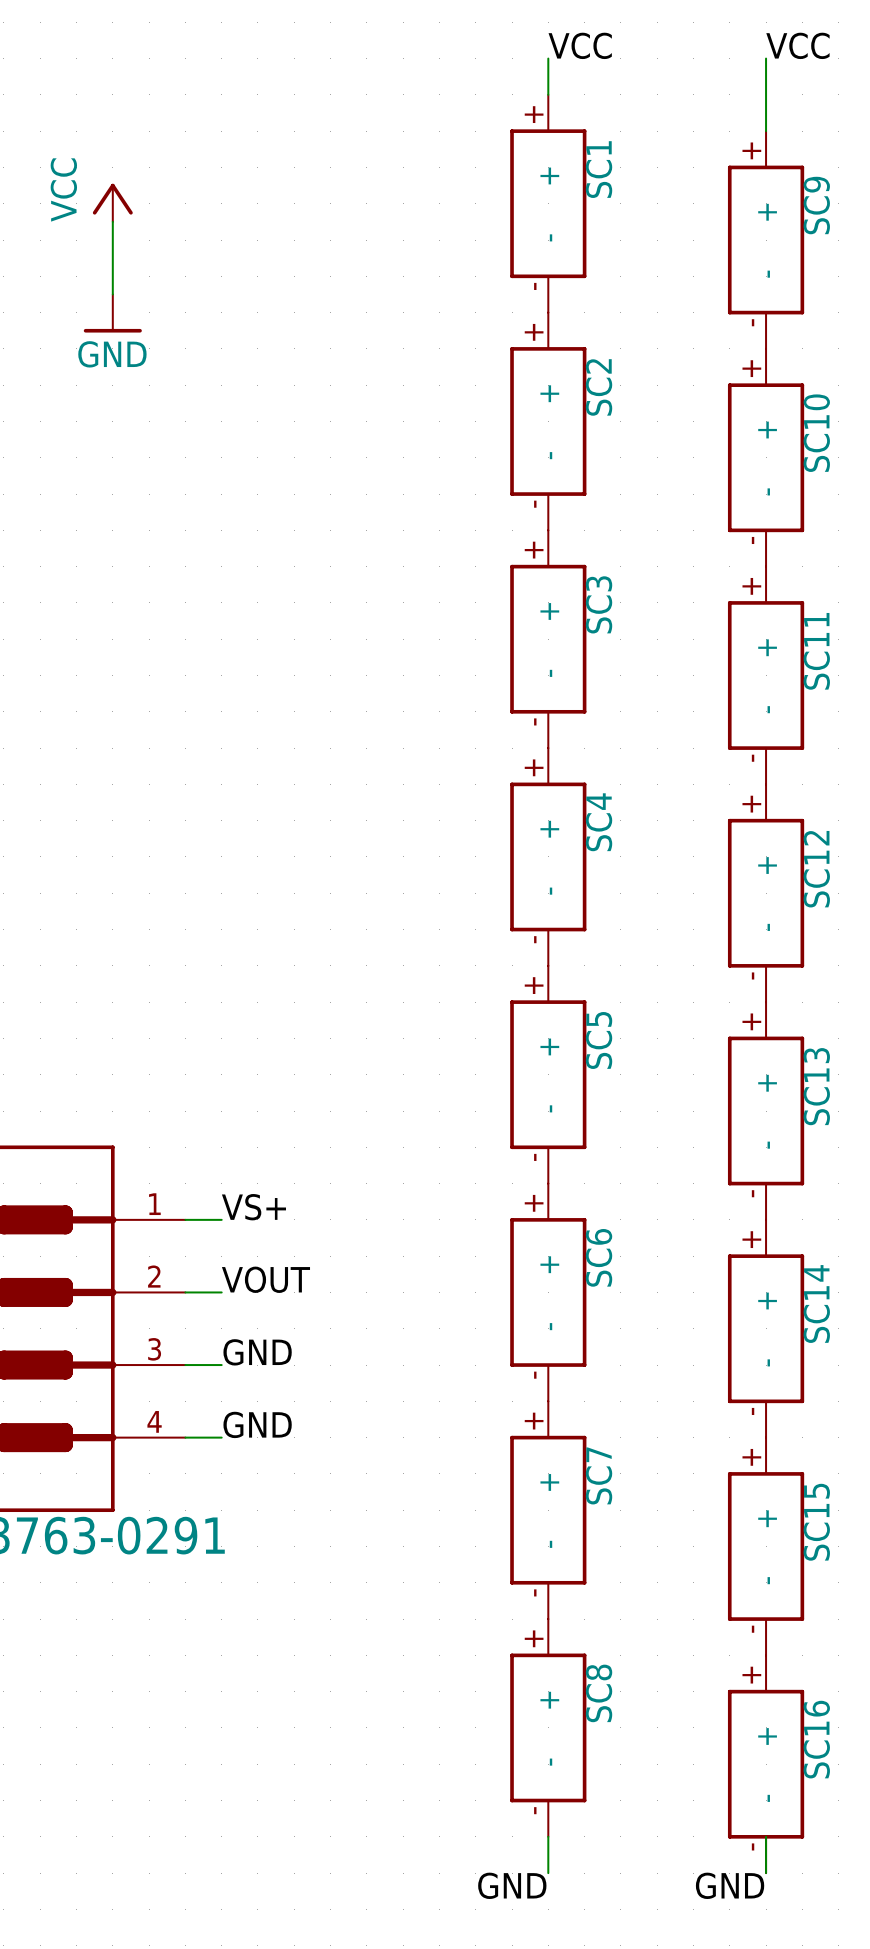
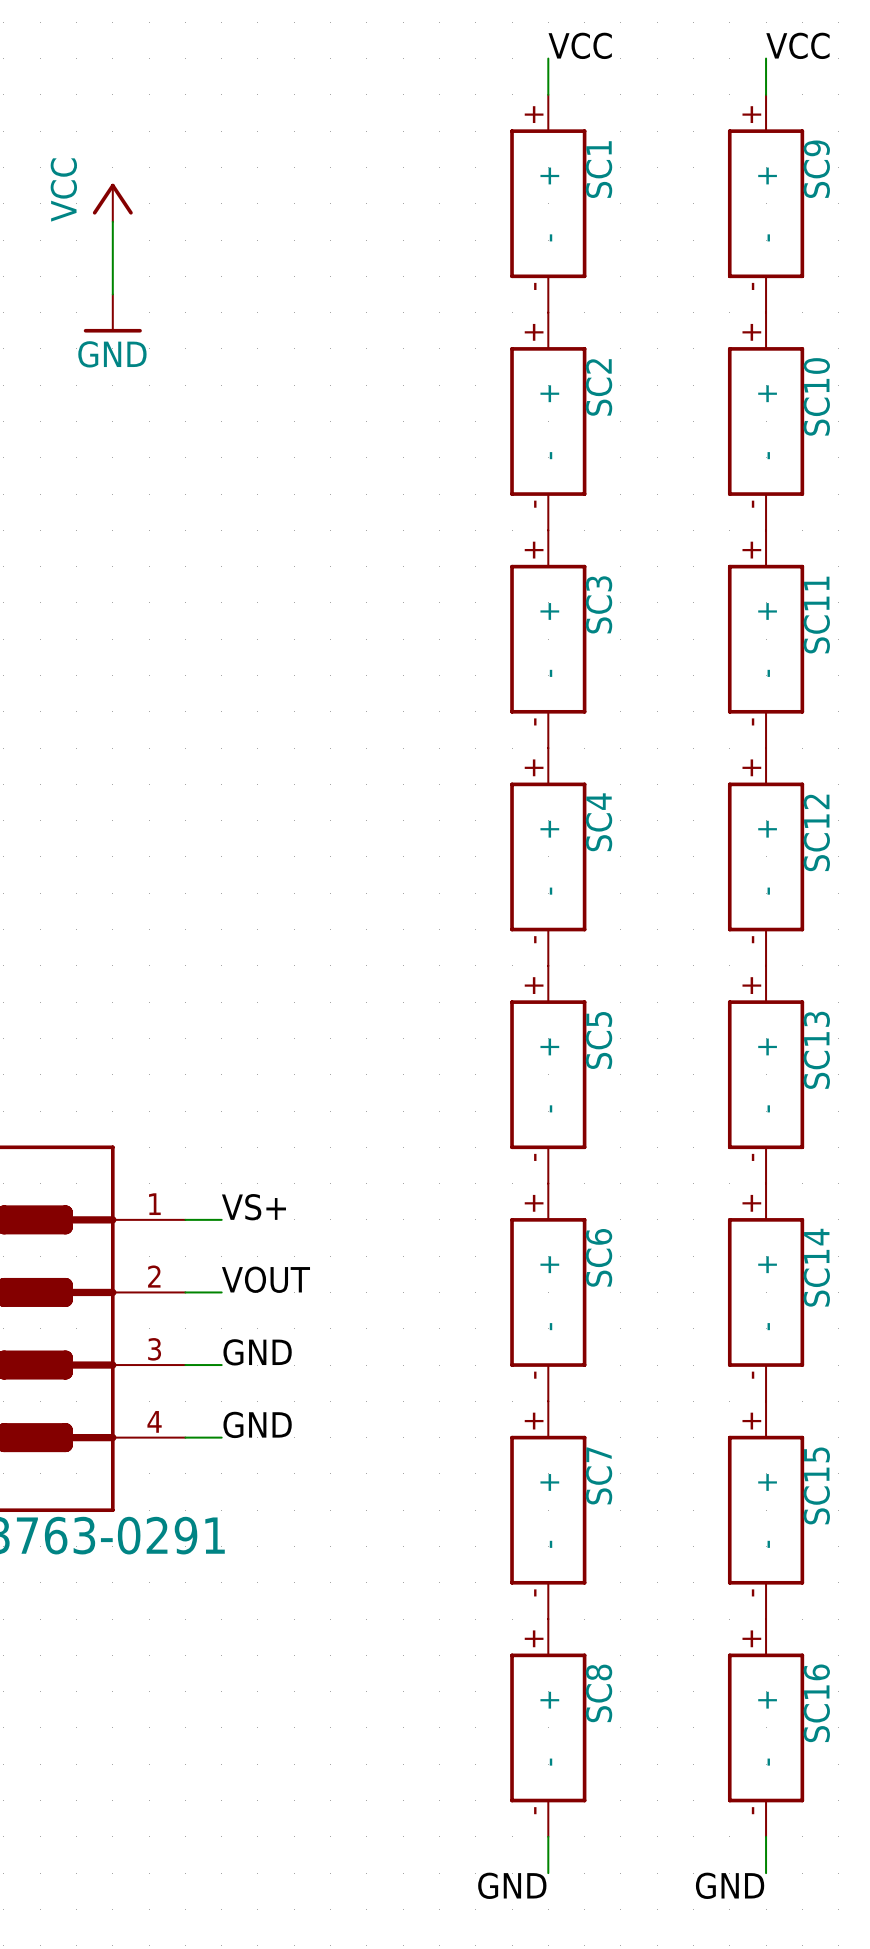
SC9 position: (766, 240) -> (766, 203)
SC10 position: (766, 457) -> (766, 421)
SC11 position: (766, 675) -> (766, 639)
SC12 position: (766, 893) -> (766, 856)
SC13 position: (766, 1111) -> (766, 1074)
SC14 position: (766, 1328) -> (766, 1292)
SC15 position: (766, 1546) -> (766, 1510)
SC16 position: (766, 1764) -> (766, 1727)

